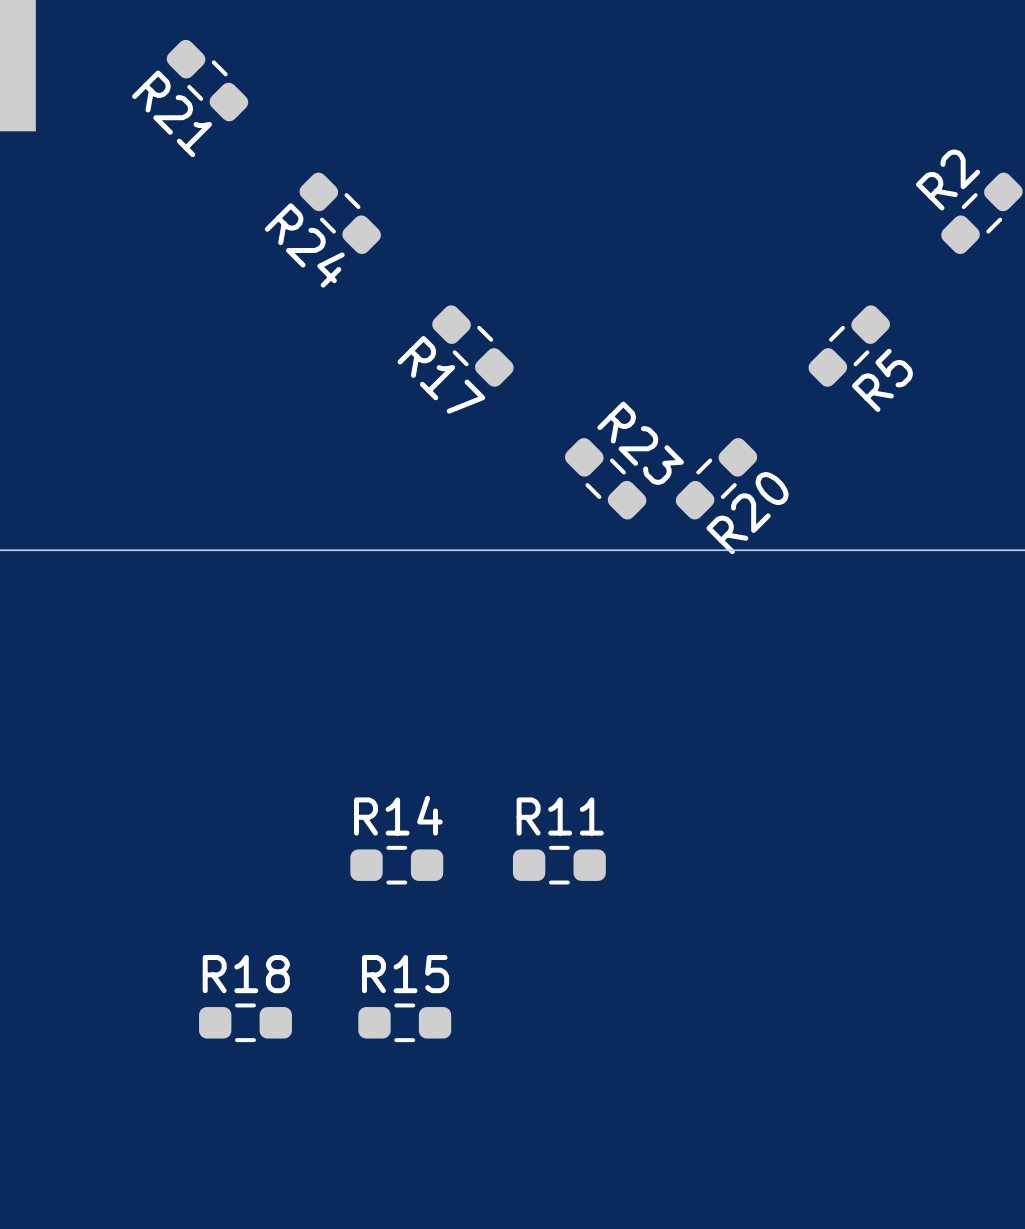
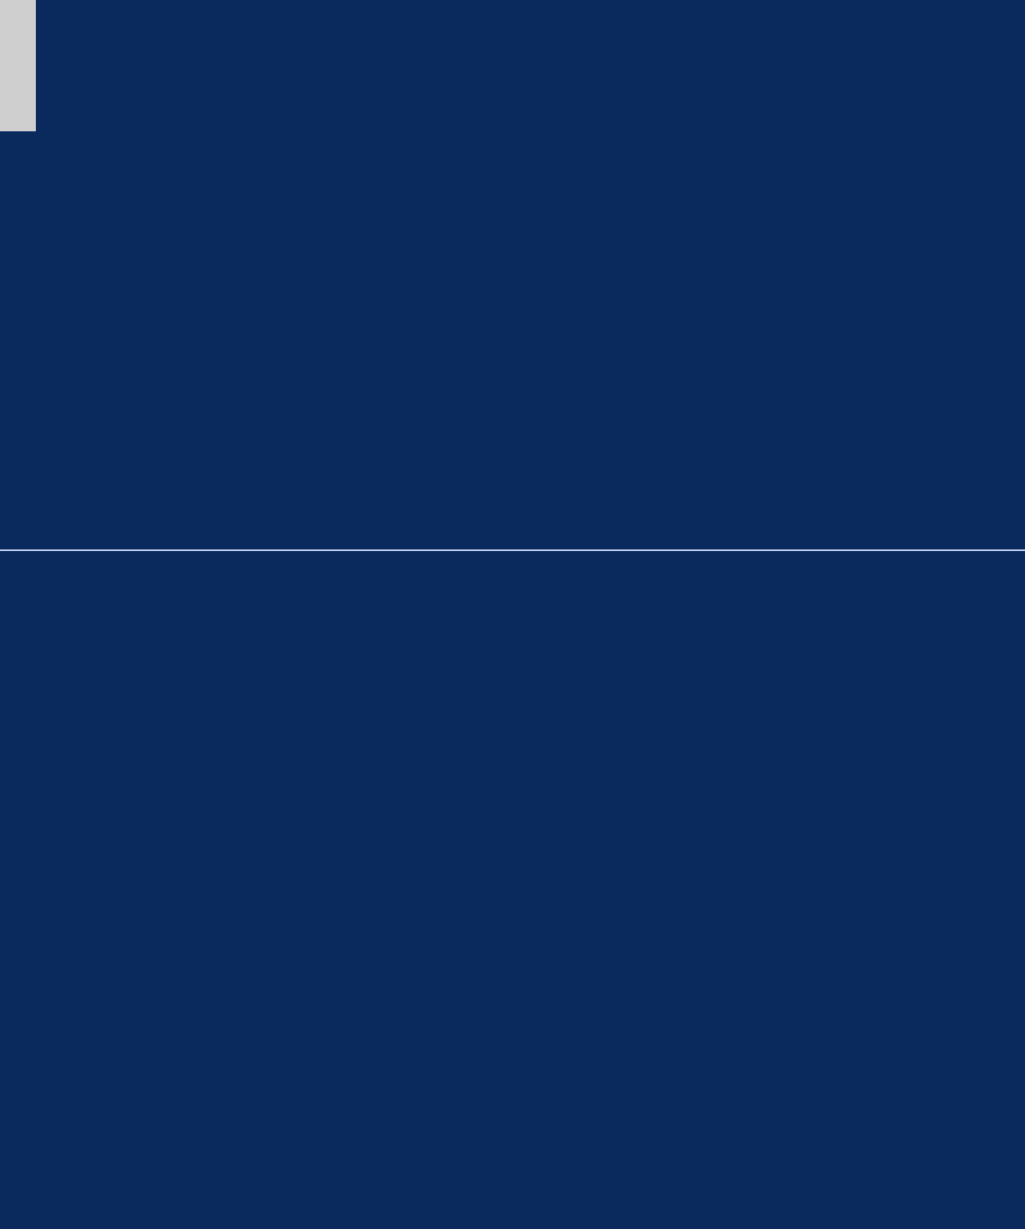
R21: (207, 80) -> none
R24: (340, 213) -> none
R2: (981, 213) -> none
R17: (472, 346) -> none
R5: (849, 346) -> none
R23: (605, 478) -> none
R20: (716, 478) -> none
R14: (396, 865) -> none
R11: (559, 865) -> none
R18: (245, 1022) -> none
R15: (404, 1022) -> none

